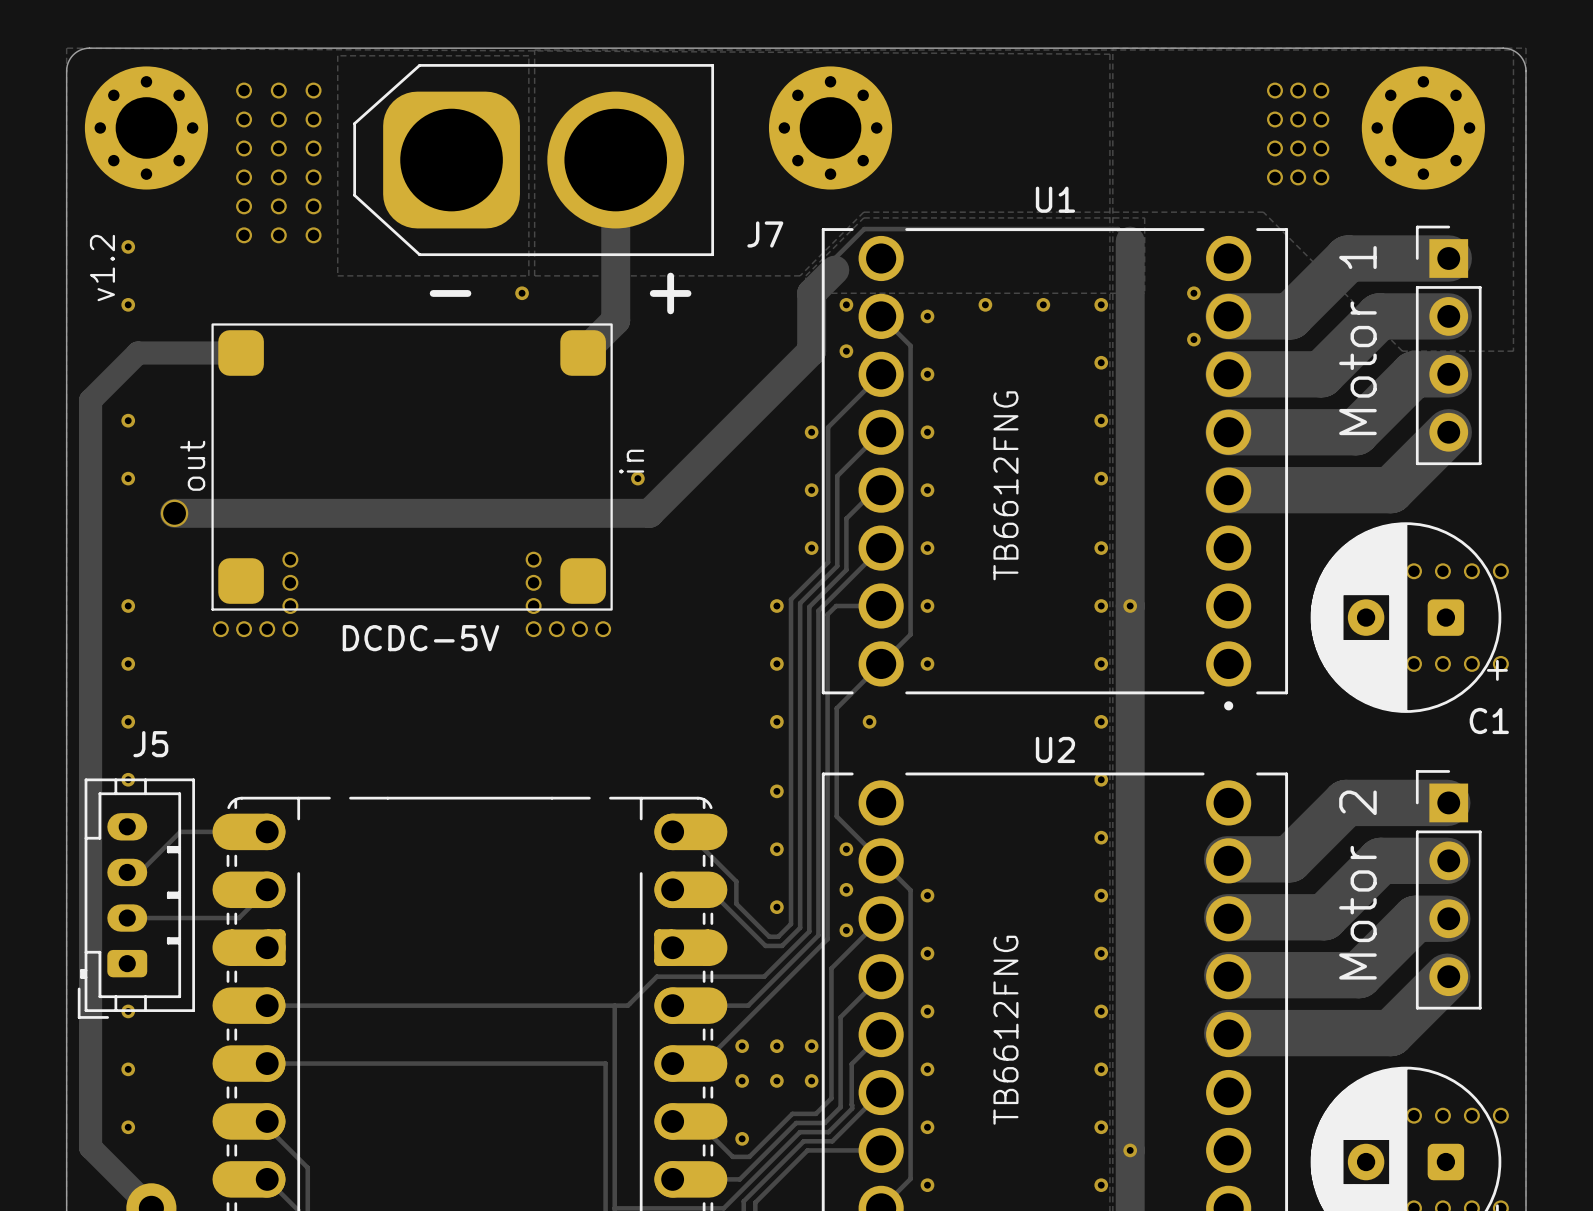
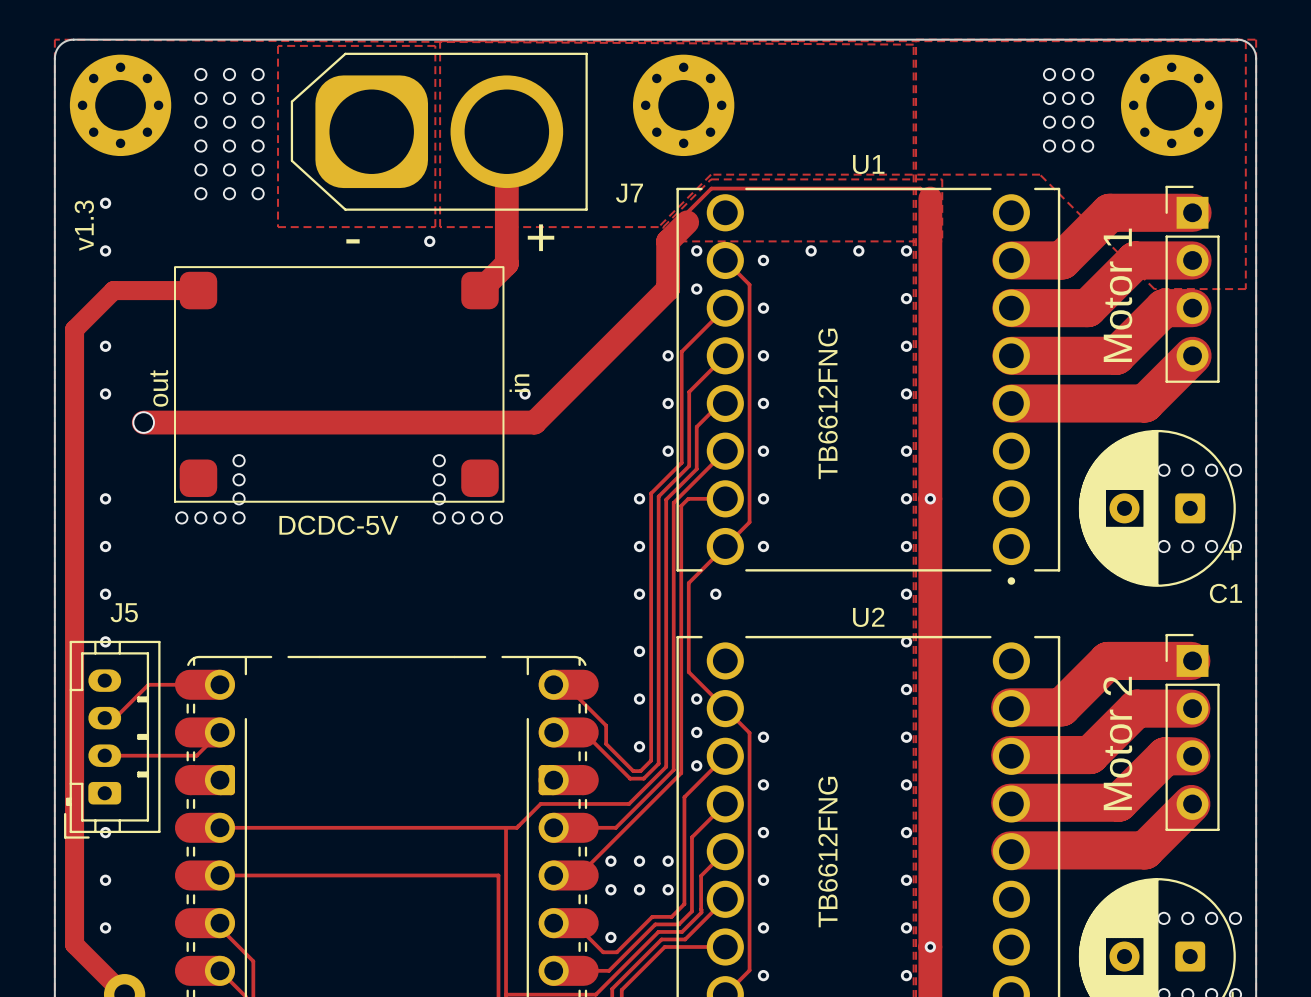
text: v1.2 (102, 268) -> v1.3 (84, 225)
via: (1193, 293) -> none
via: (1193, 339) -> none

